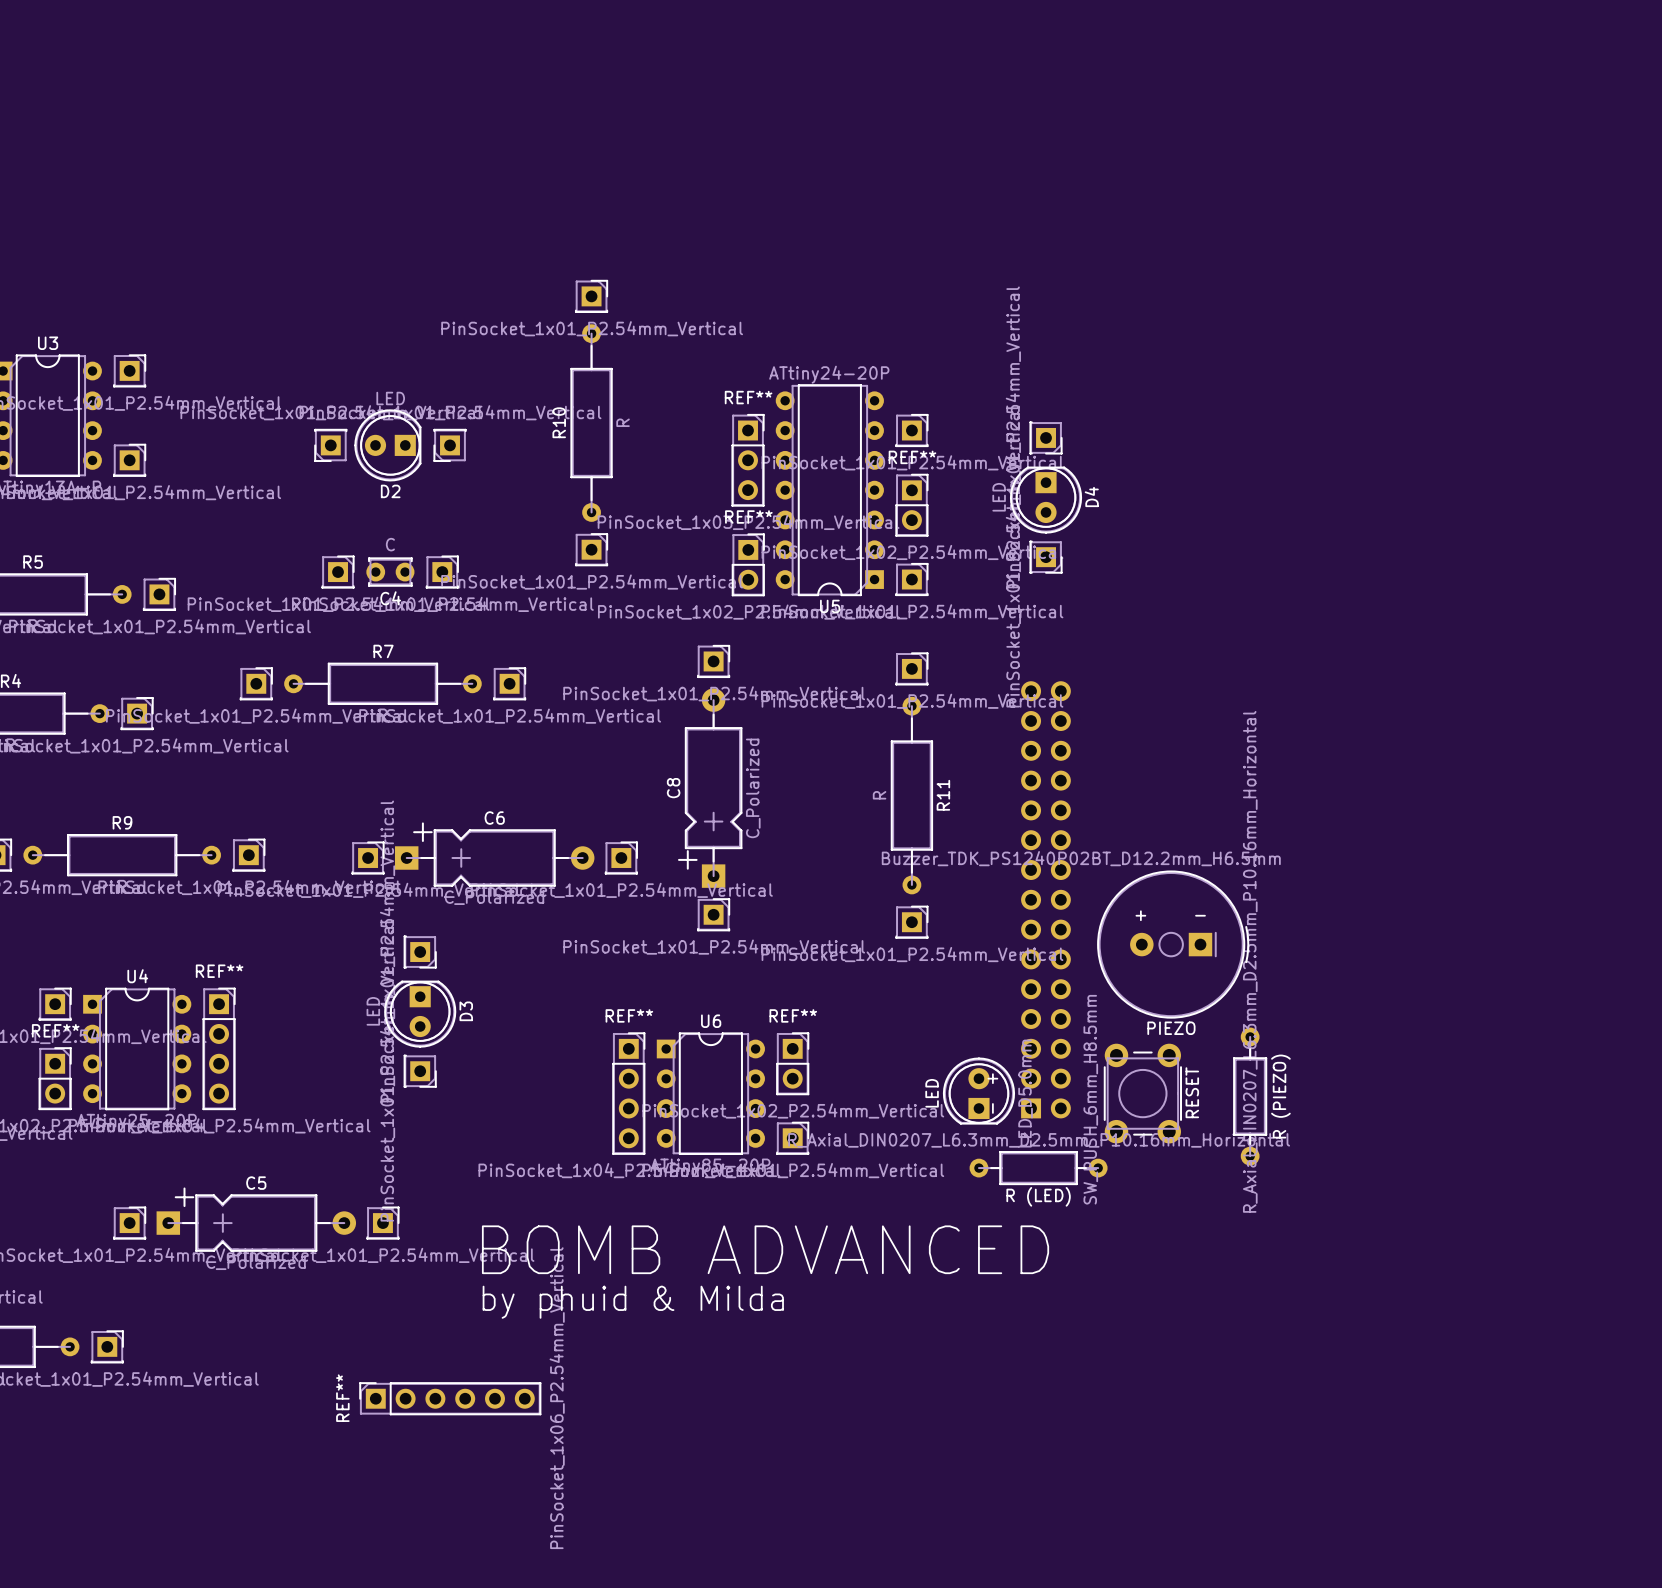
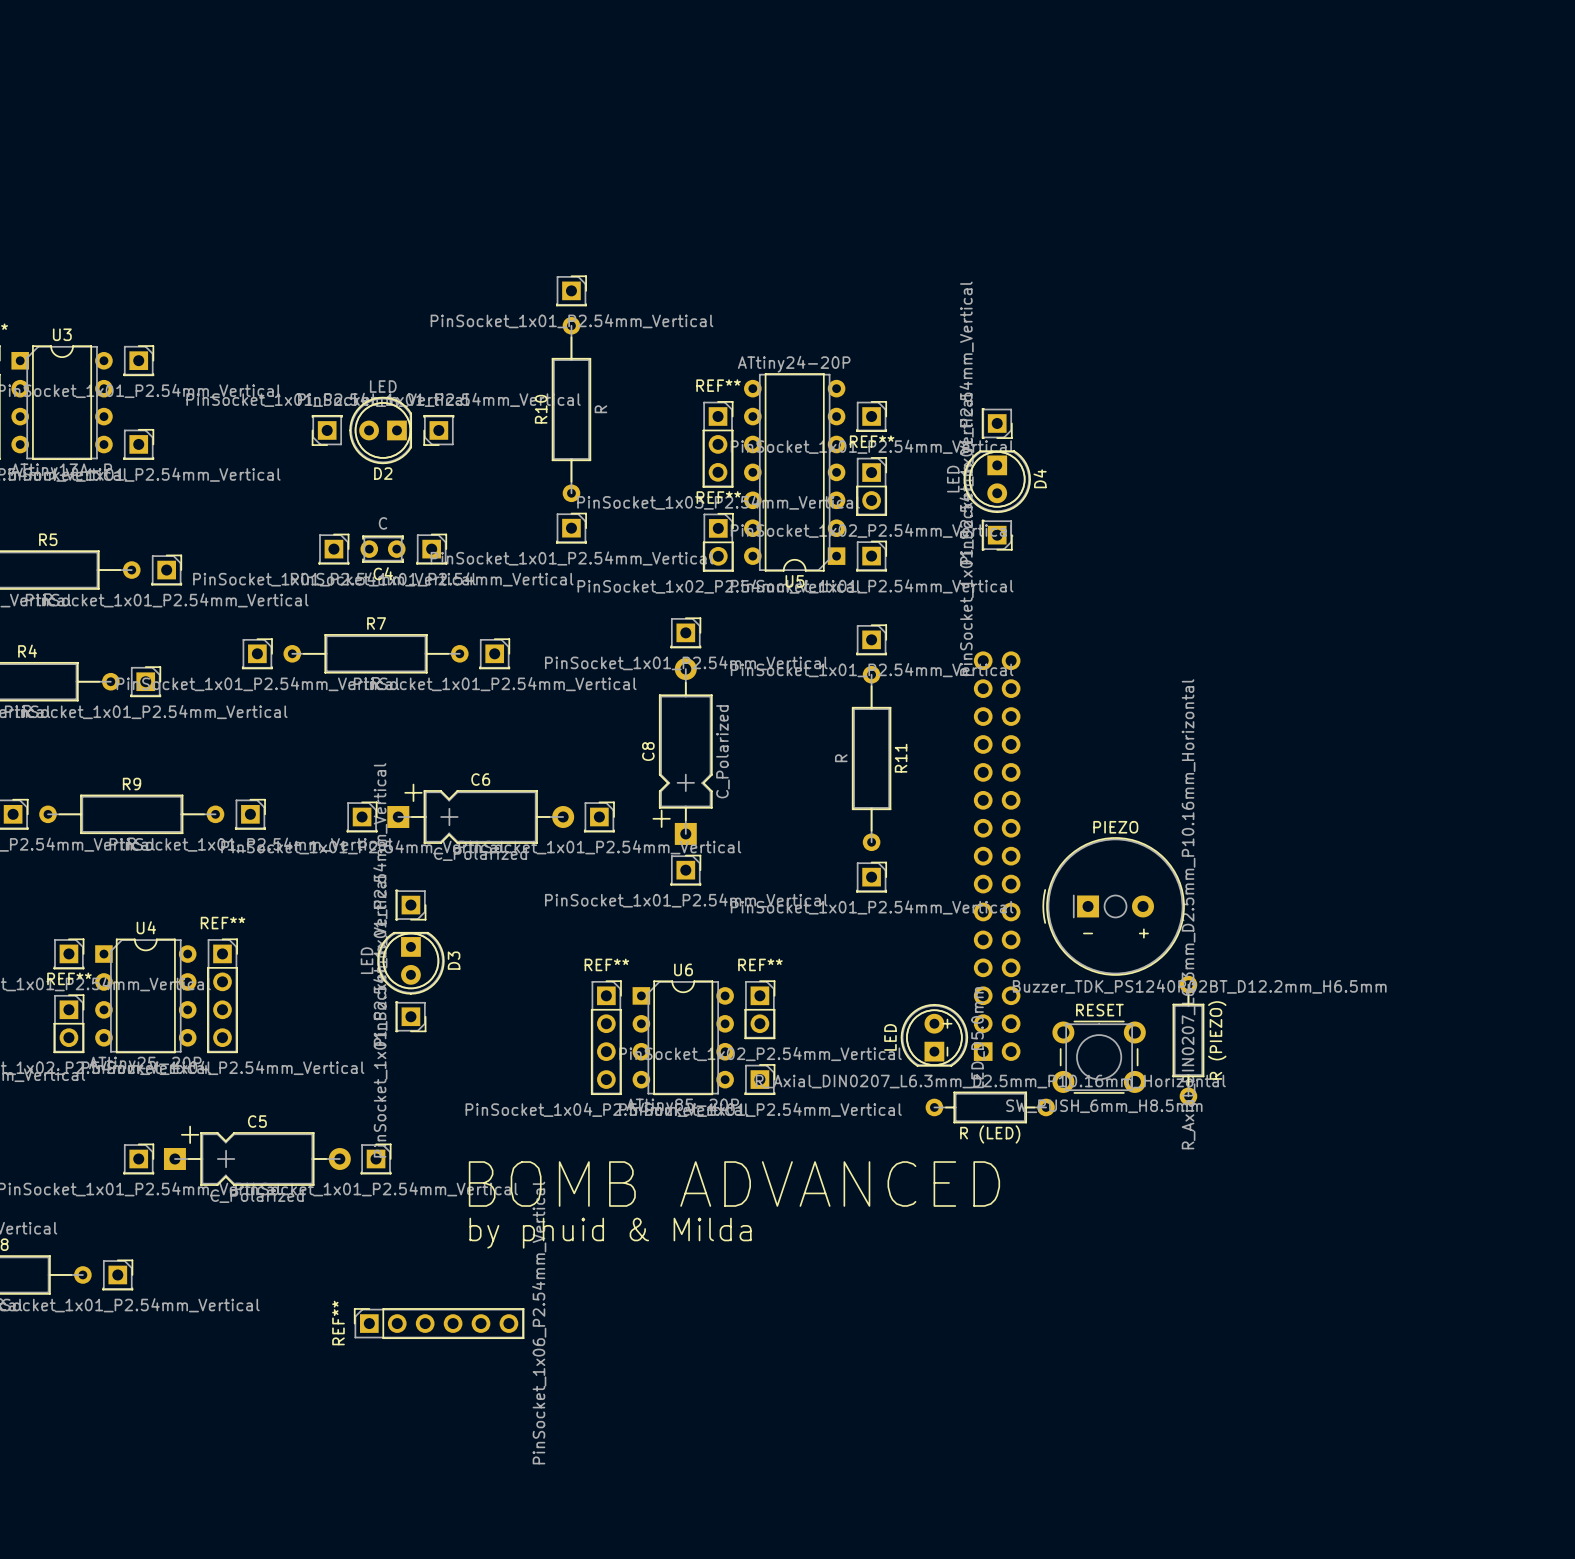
text rotation: 0° (1140, 915) -> 180° (1143, 933)
text position: + (1140, 915) -> + (1143, 933)
text rotation: 0° (1200, 915) -> 180° (1088, 933)
text position: - (1200, 915) -> - (1088, 933)
PIEZO rotation: 0° (1173, 944) -> 180° (1113, 906)
RESET rotation: 0° (1142, 1093) -> 90° counterclockwise (1099, 1057)

